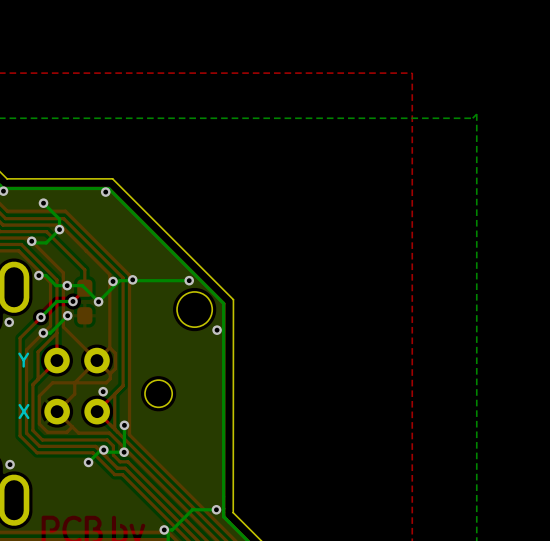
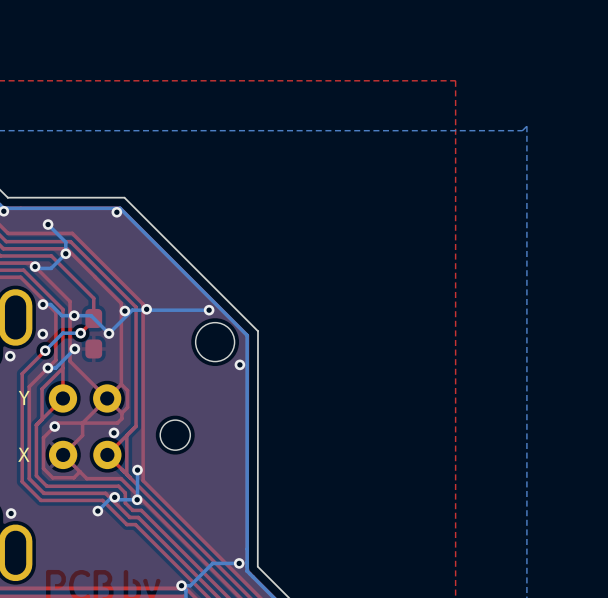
via: none -> (42, 334)
via: none -> (54, 426)

